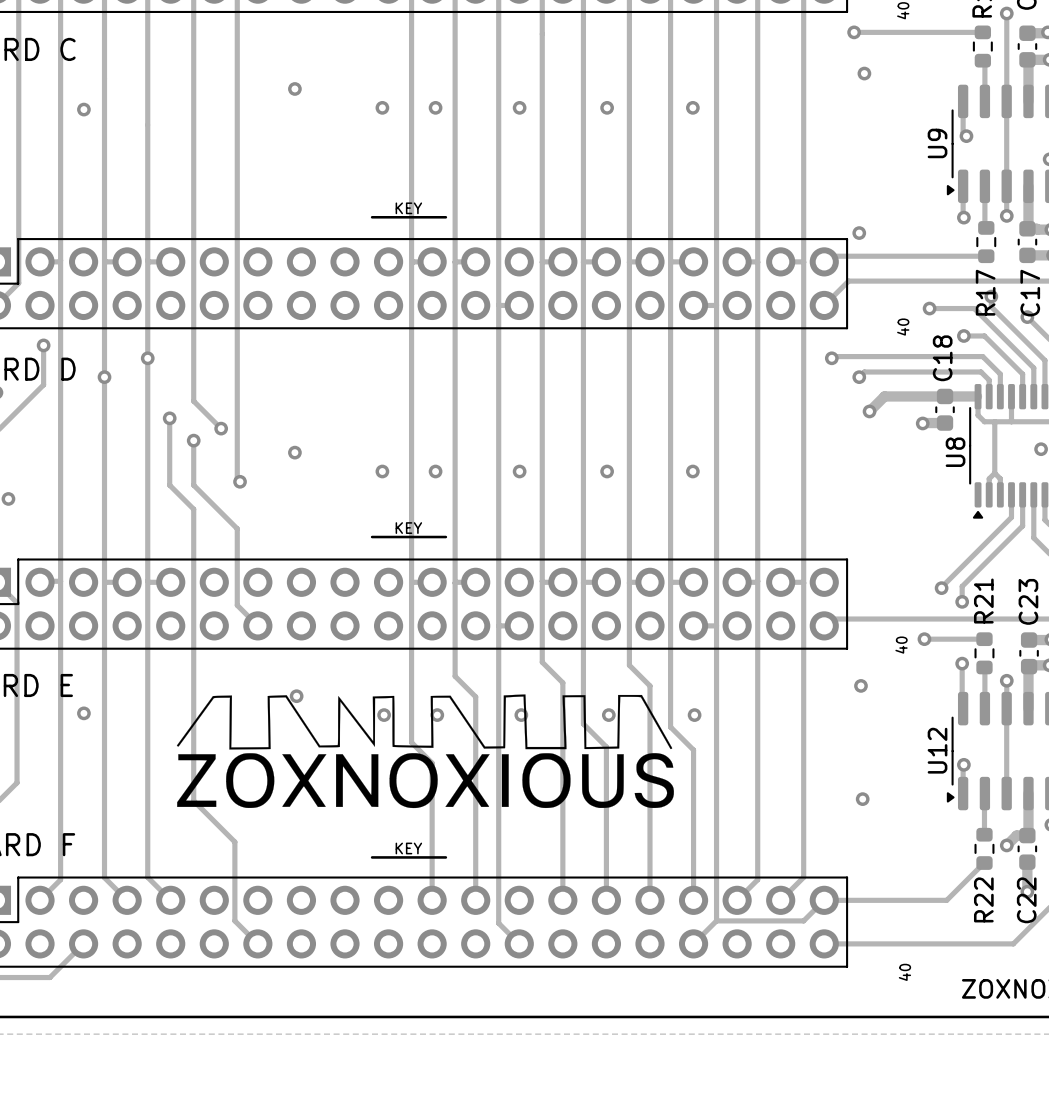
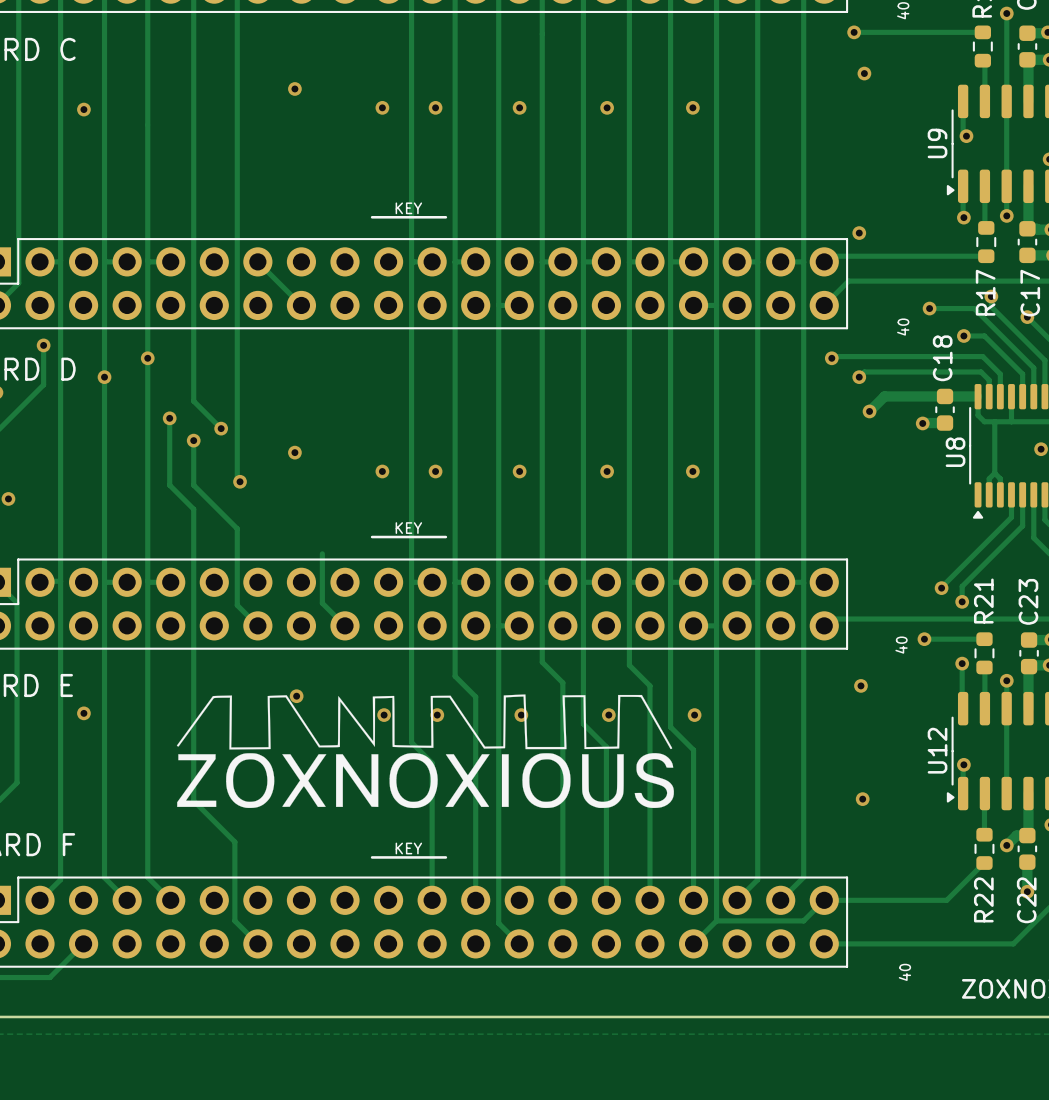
track: none -> (257, 261) (301, 305)
track: none -> (322, 553) (322, 603) (345, 625)

